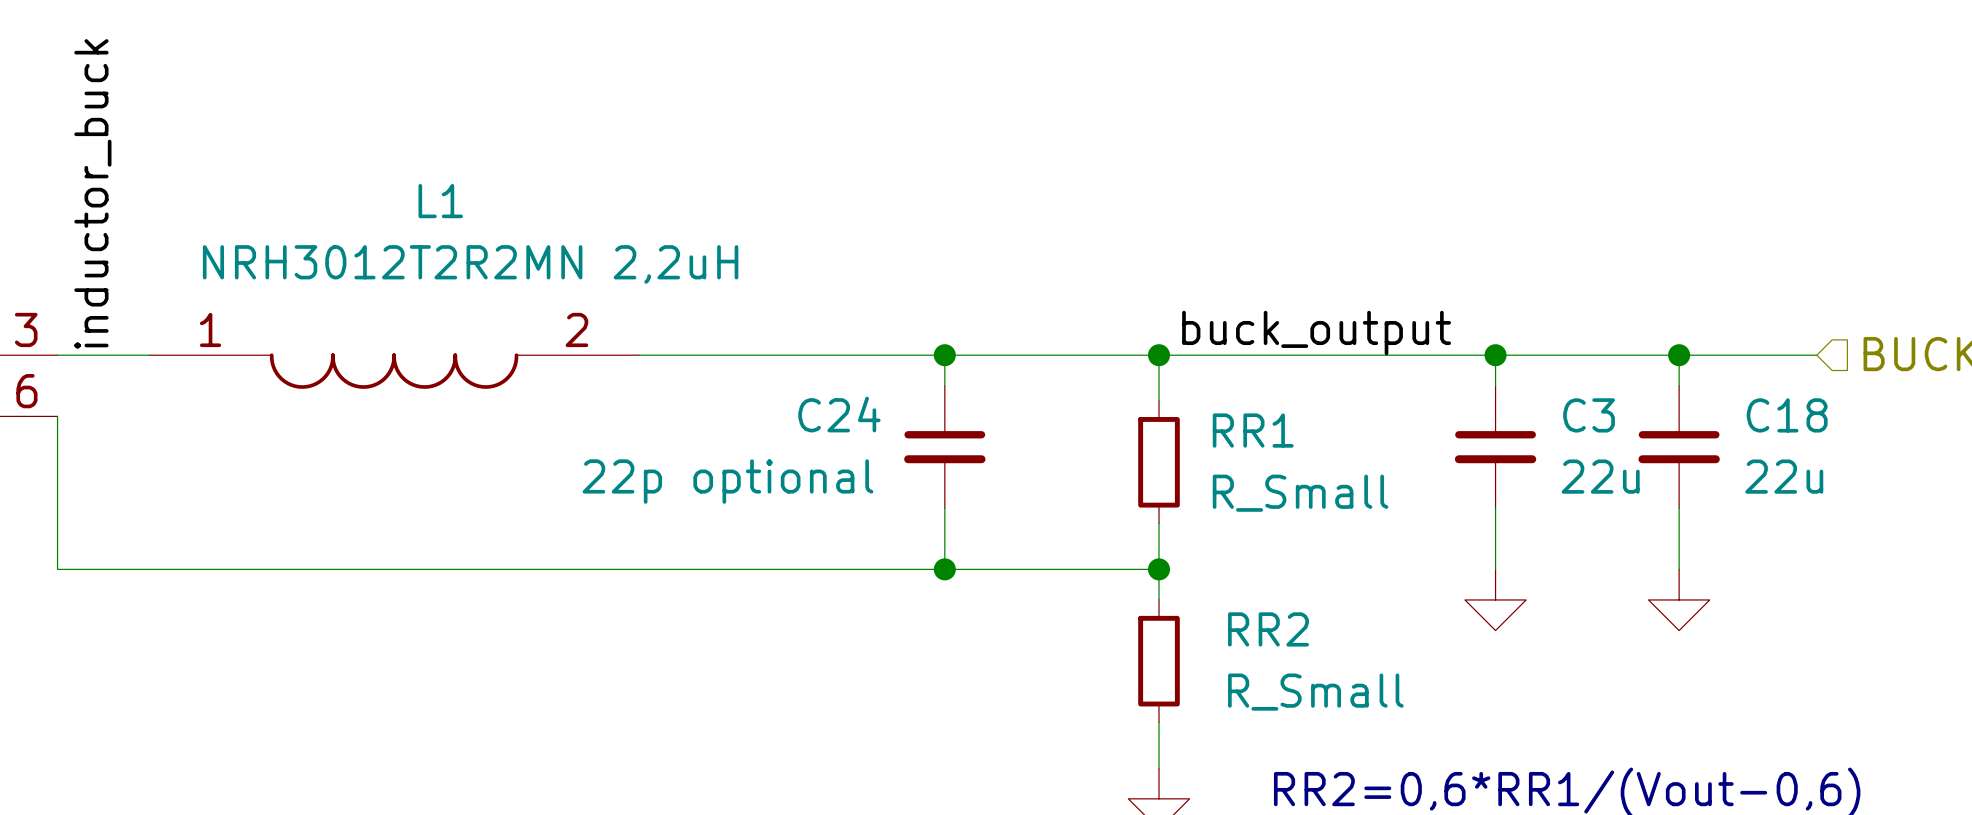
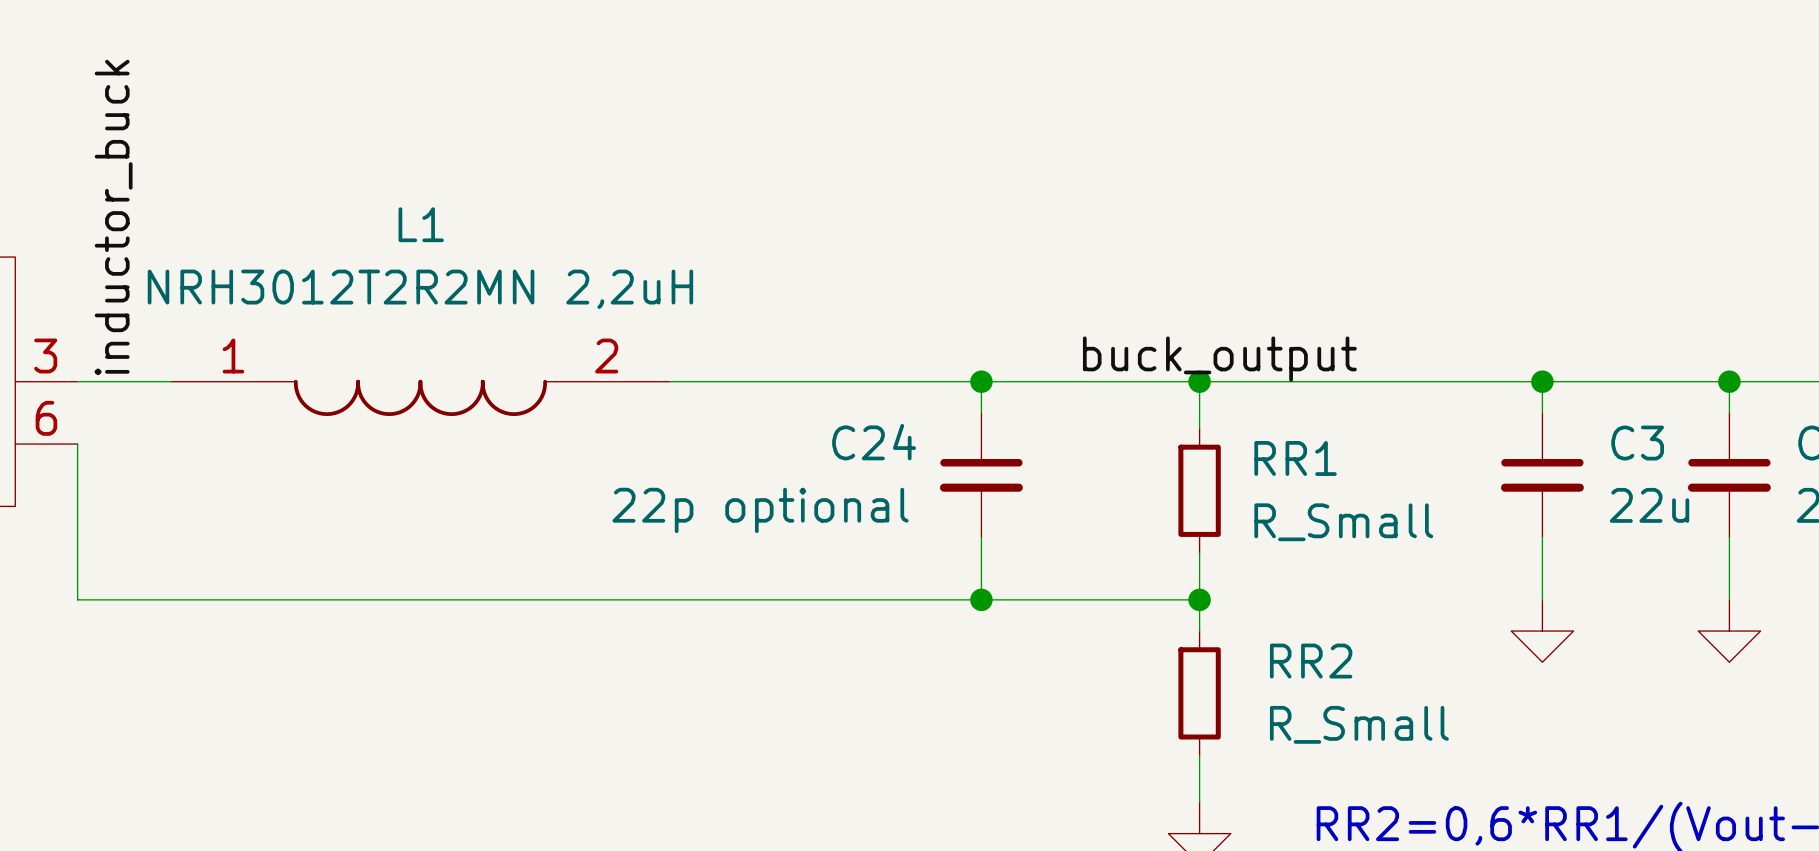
L1 name position: L1 (440, 201) -> L1 (421, 224)
L1 value position: NRH3012T2R2MN 2,2uH (470, 264) -> NRH3012T2R2MN 2,2uH (420, 289)
label position: buck_output (1316, 333) -> buck_output (1219, 359)

